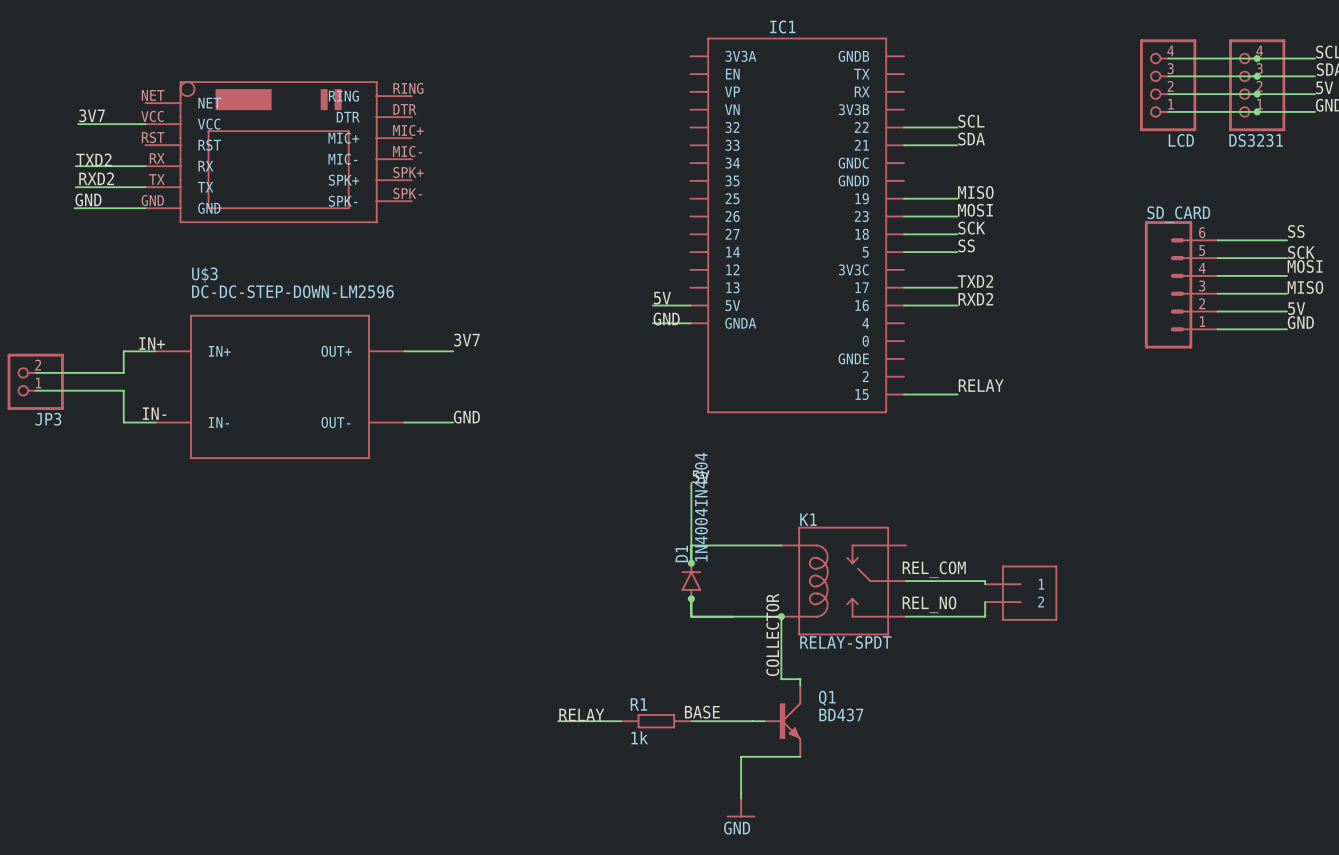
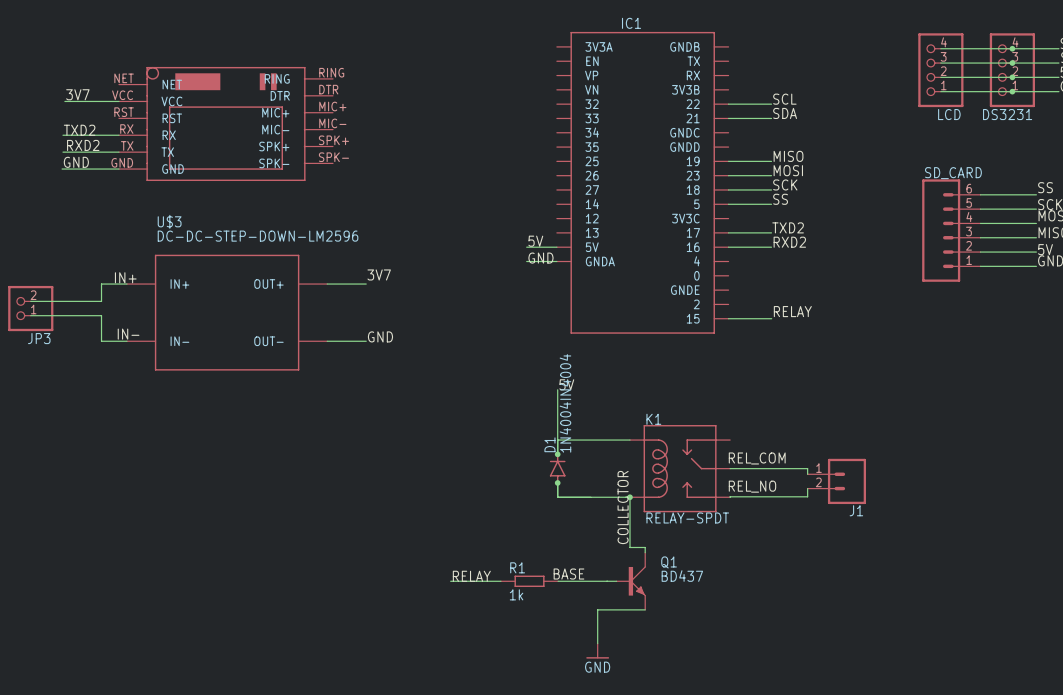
wire: (985, 581) (985, 584) -> (793, 468) (807, 468) (807, 474)
part: (1021, 593) -> none
J1: none -> (836, 481)
wire: (985, 602) (985, 616) (905, 616) -> (807, 488) (807, 496) (730, 497)

